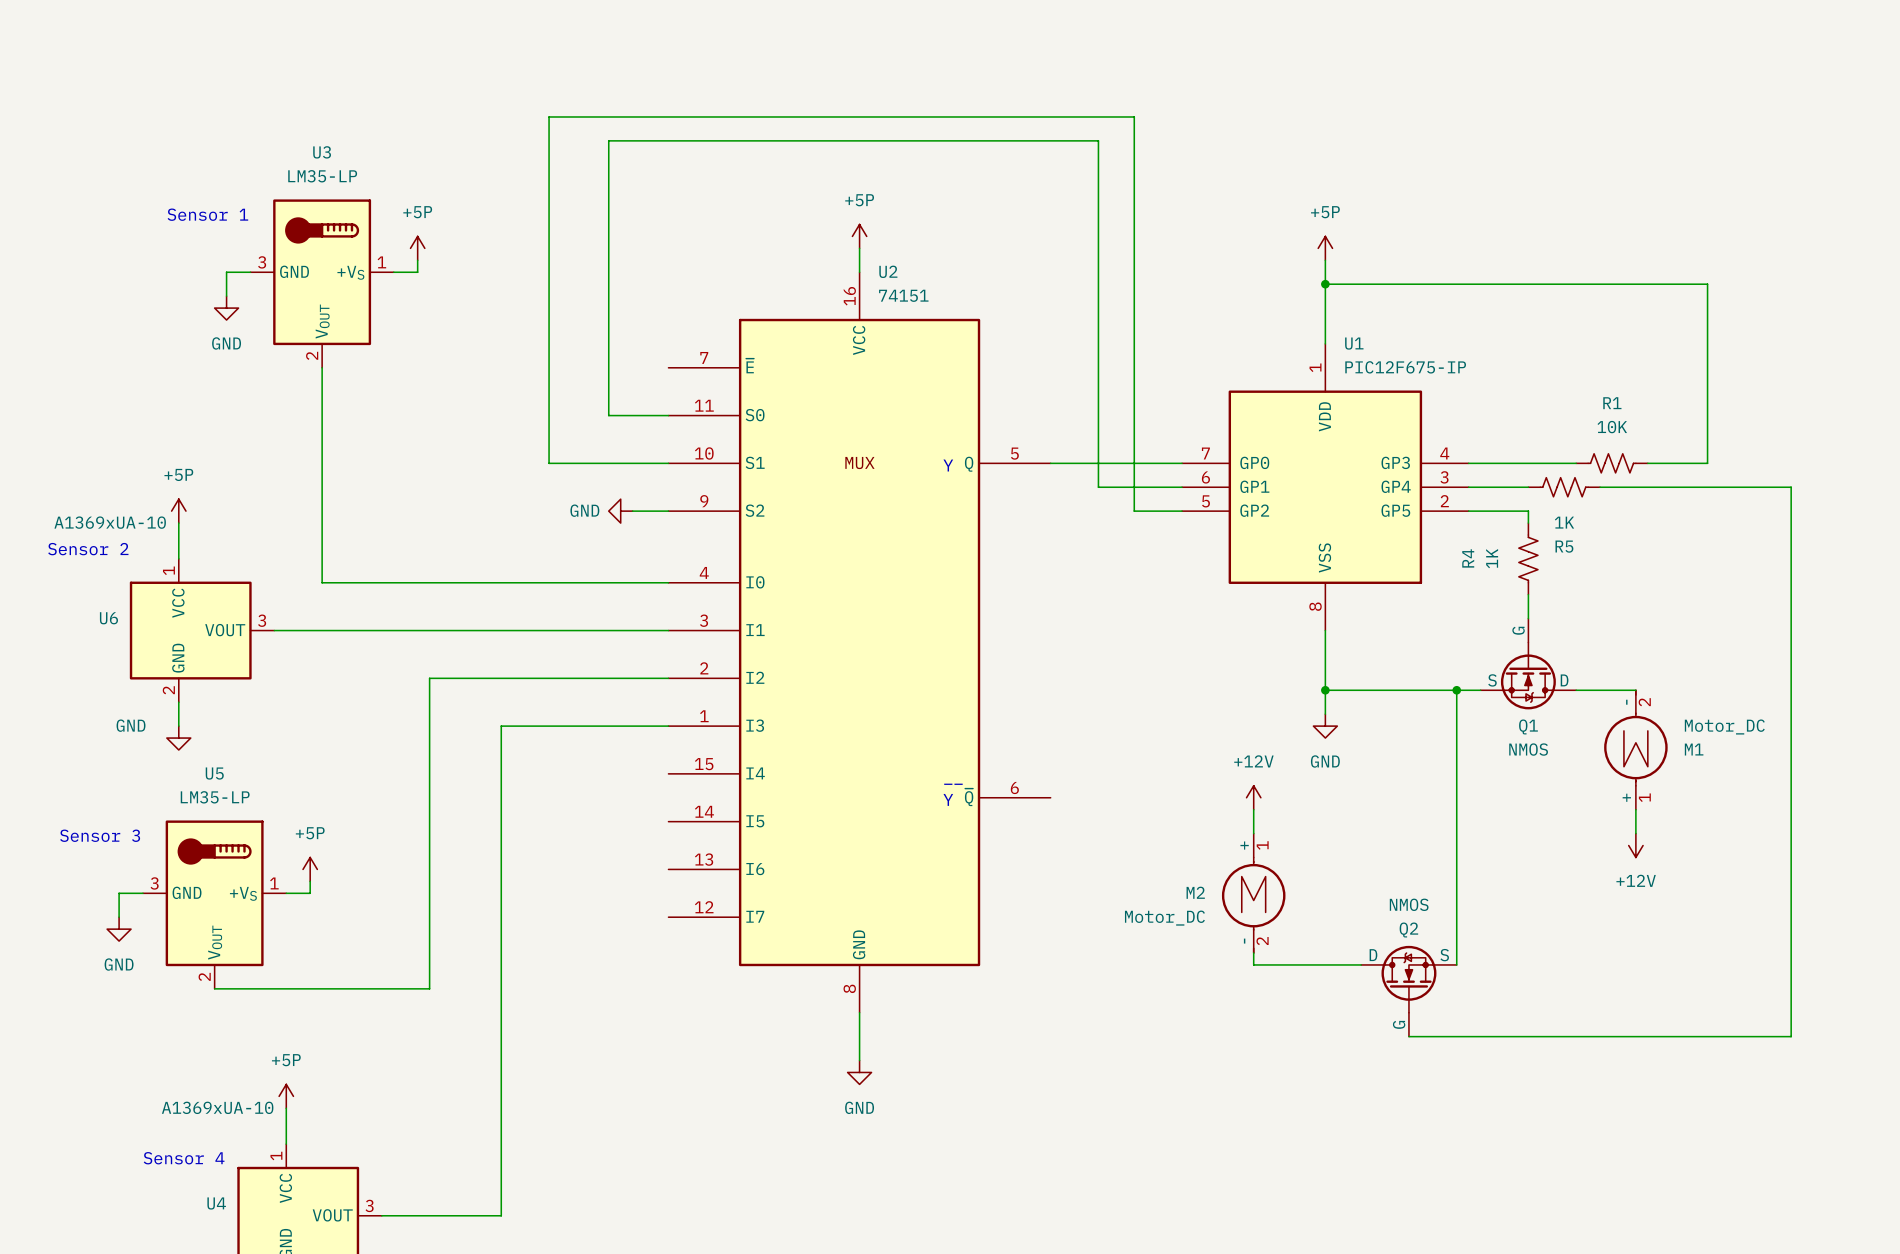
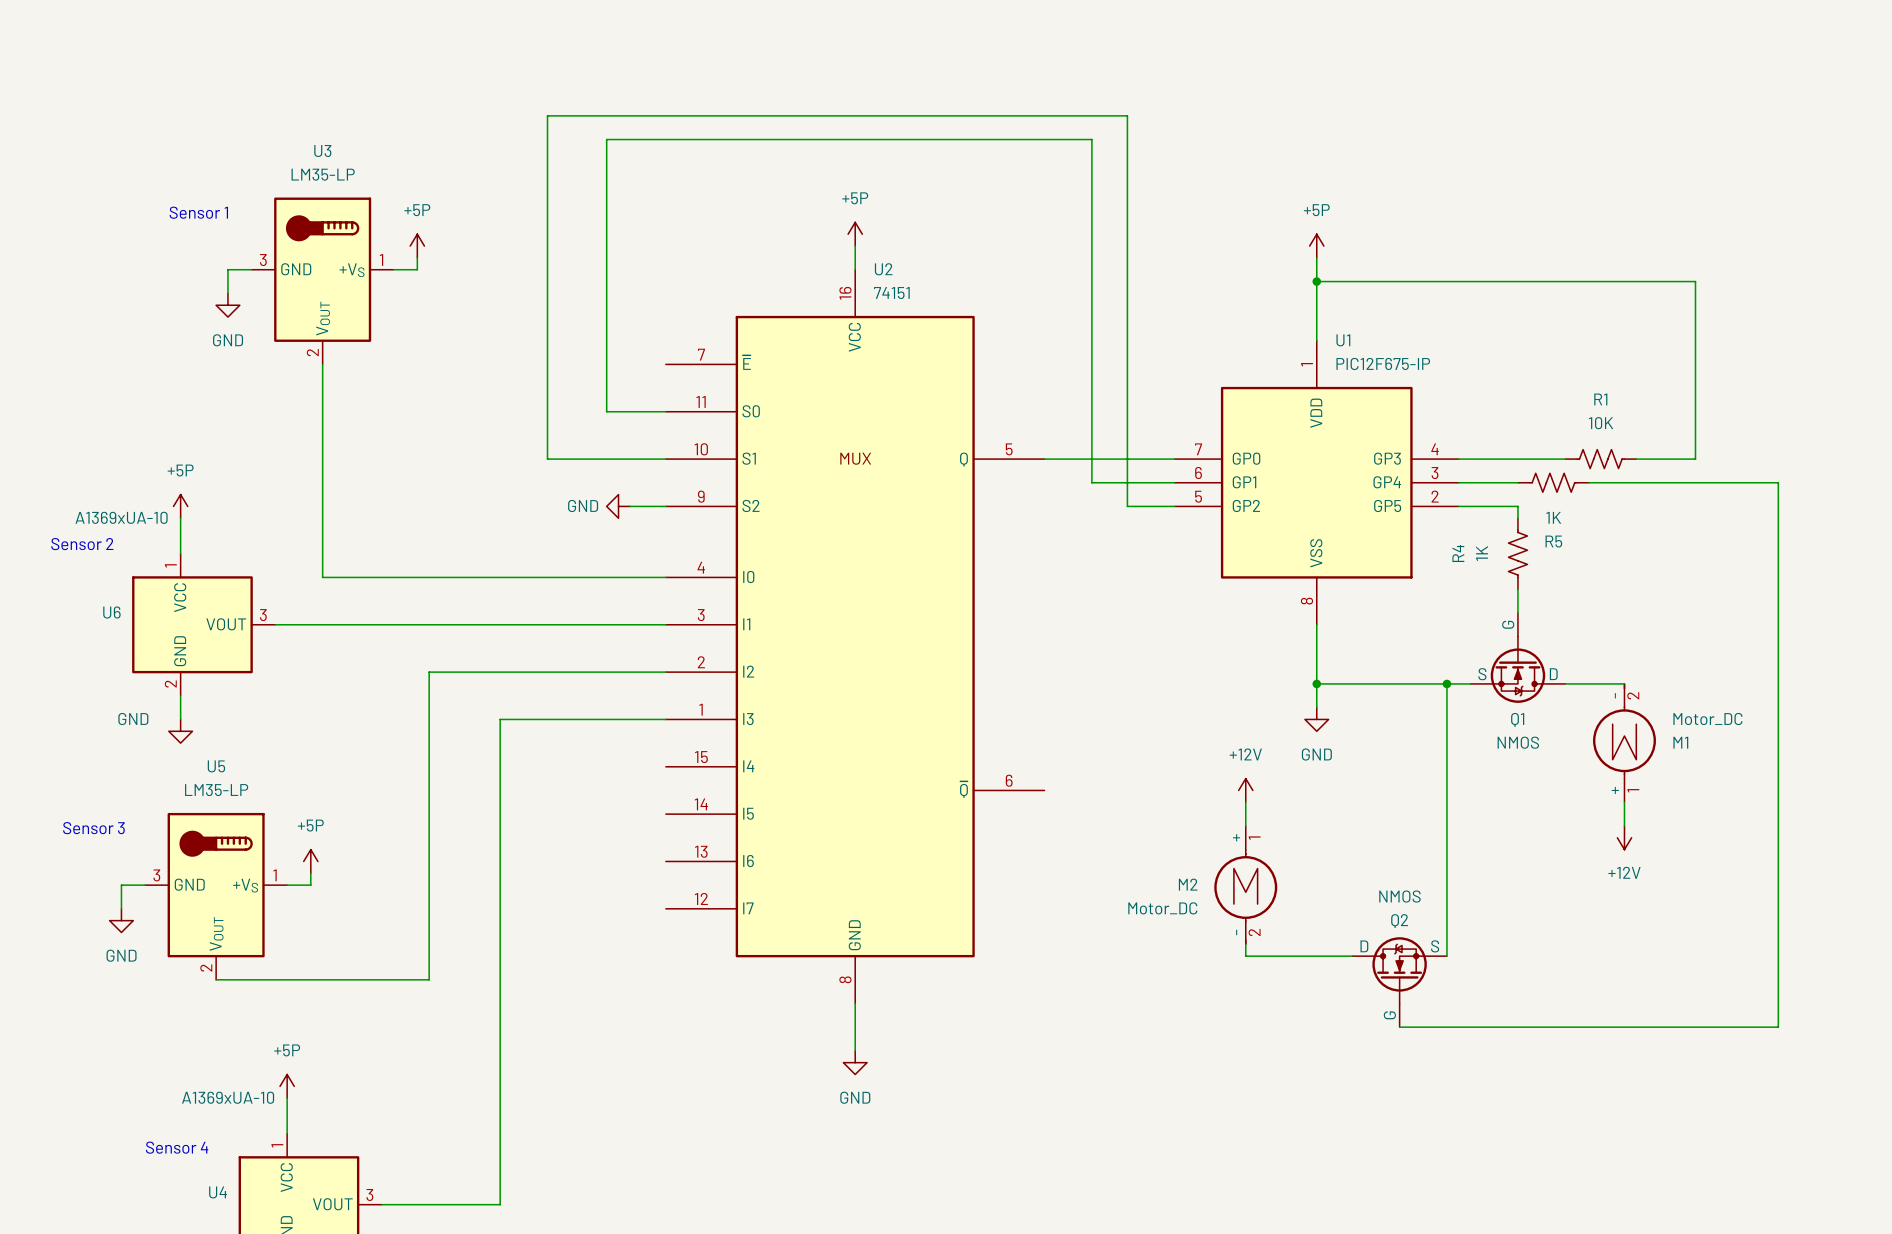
text: Y (948, 465) -> none
text: __ (953, 784) -> none
text: Y (948, 799) -> none

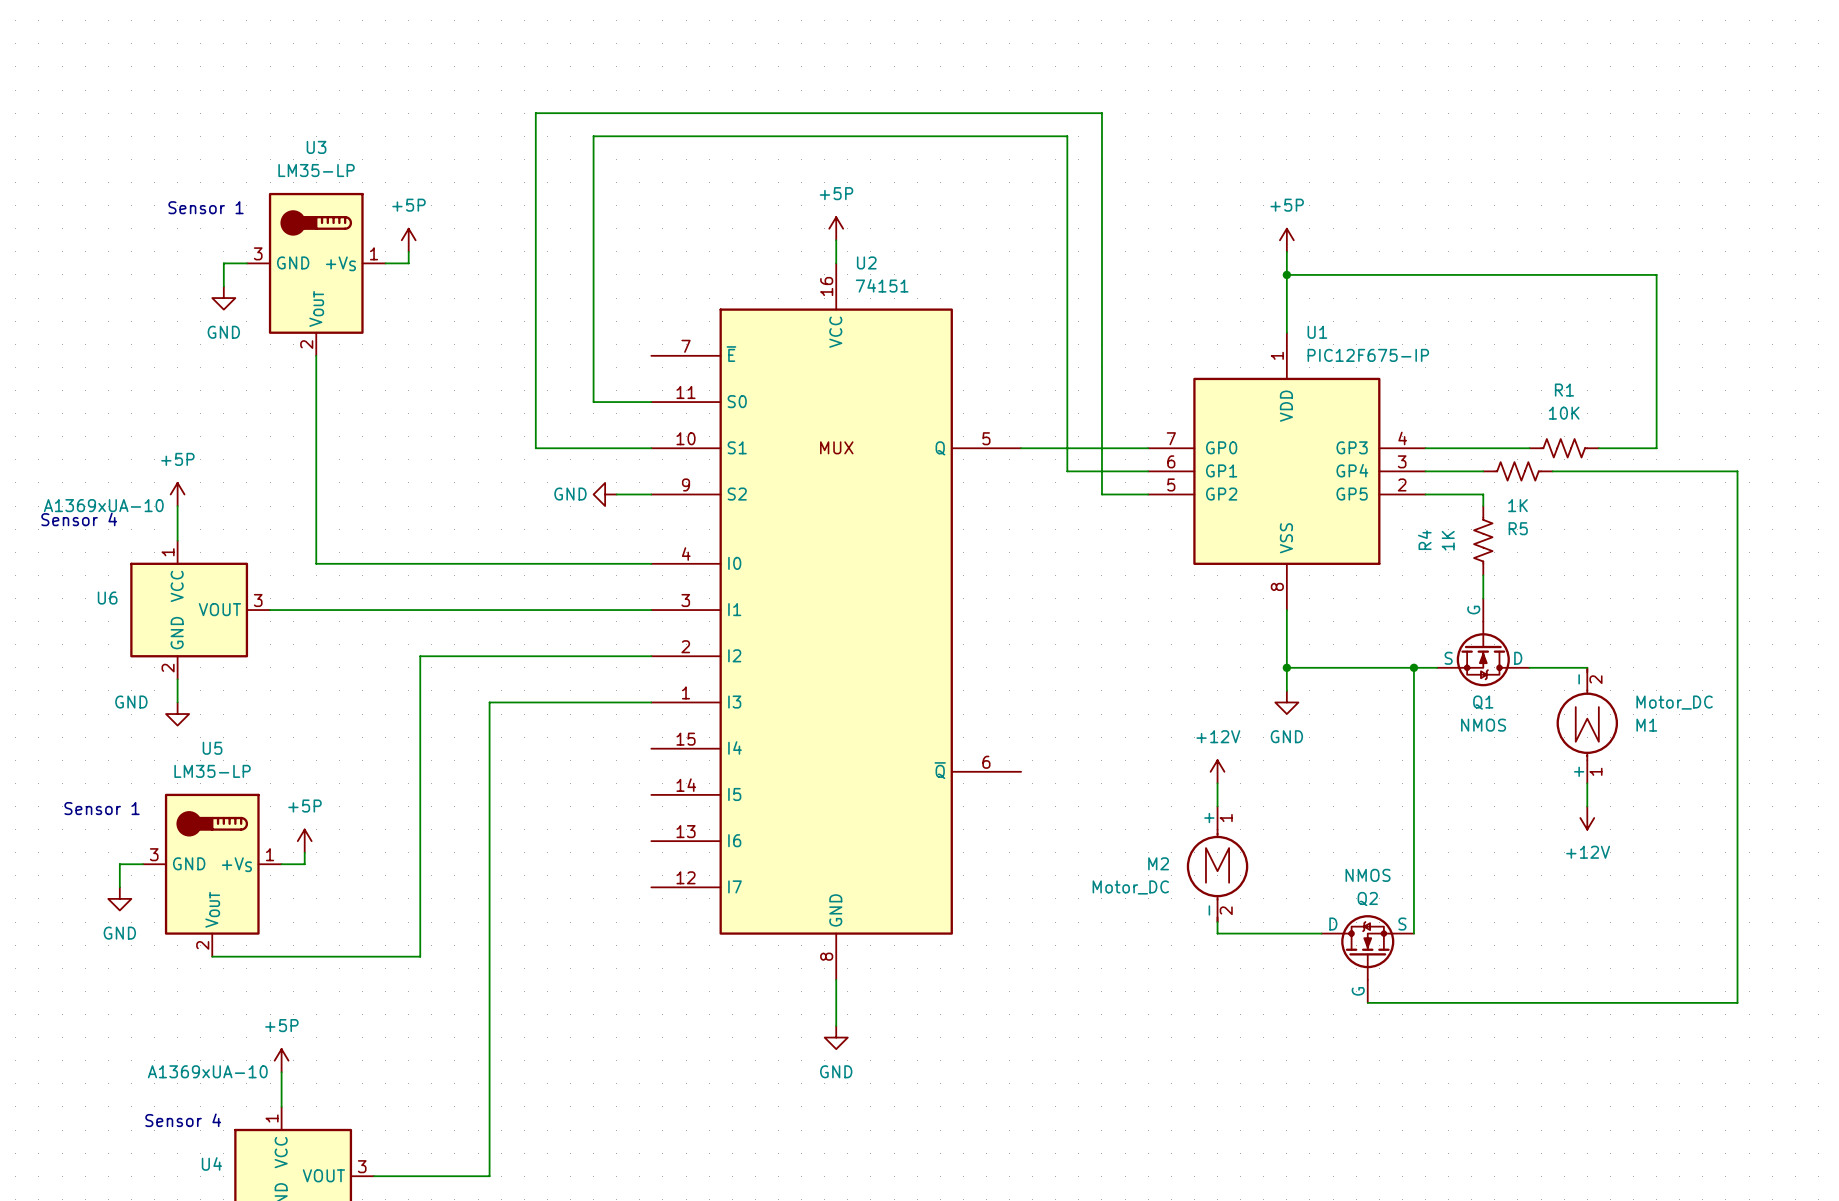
text: Sensor 2 (82, 544) -> Sensor 4 (79, 519)
text: Sensor 3 (93, 828) -> Sensor 1 (102, 808)

